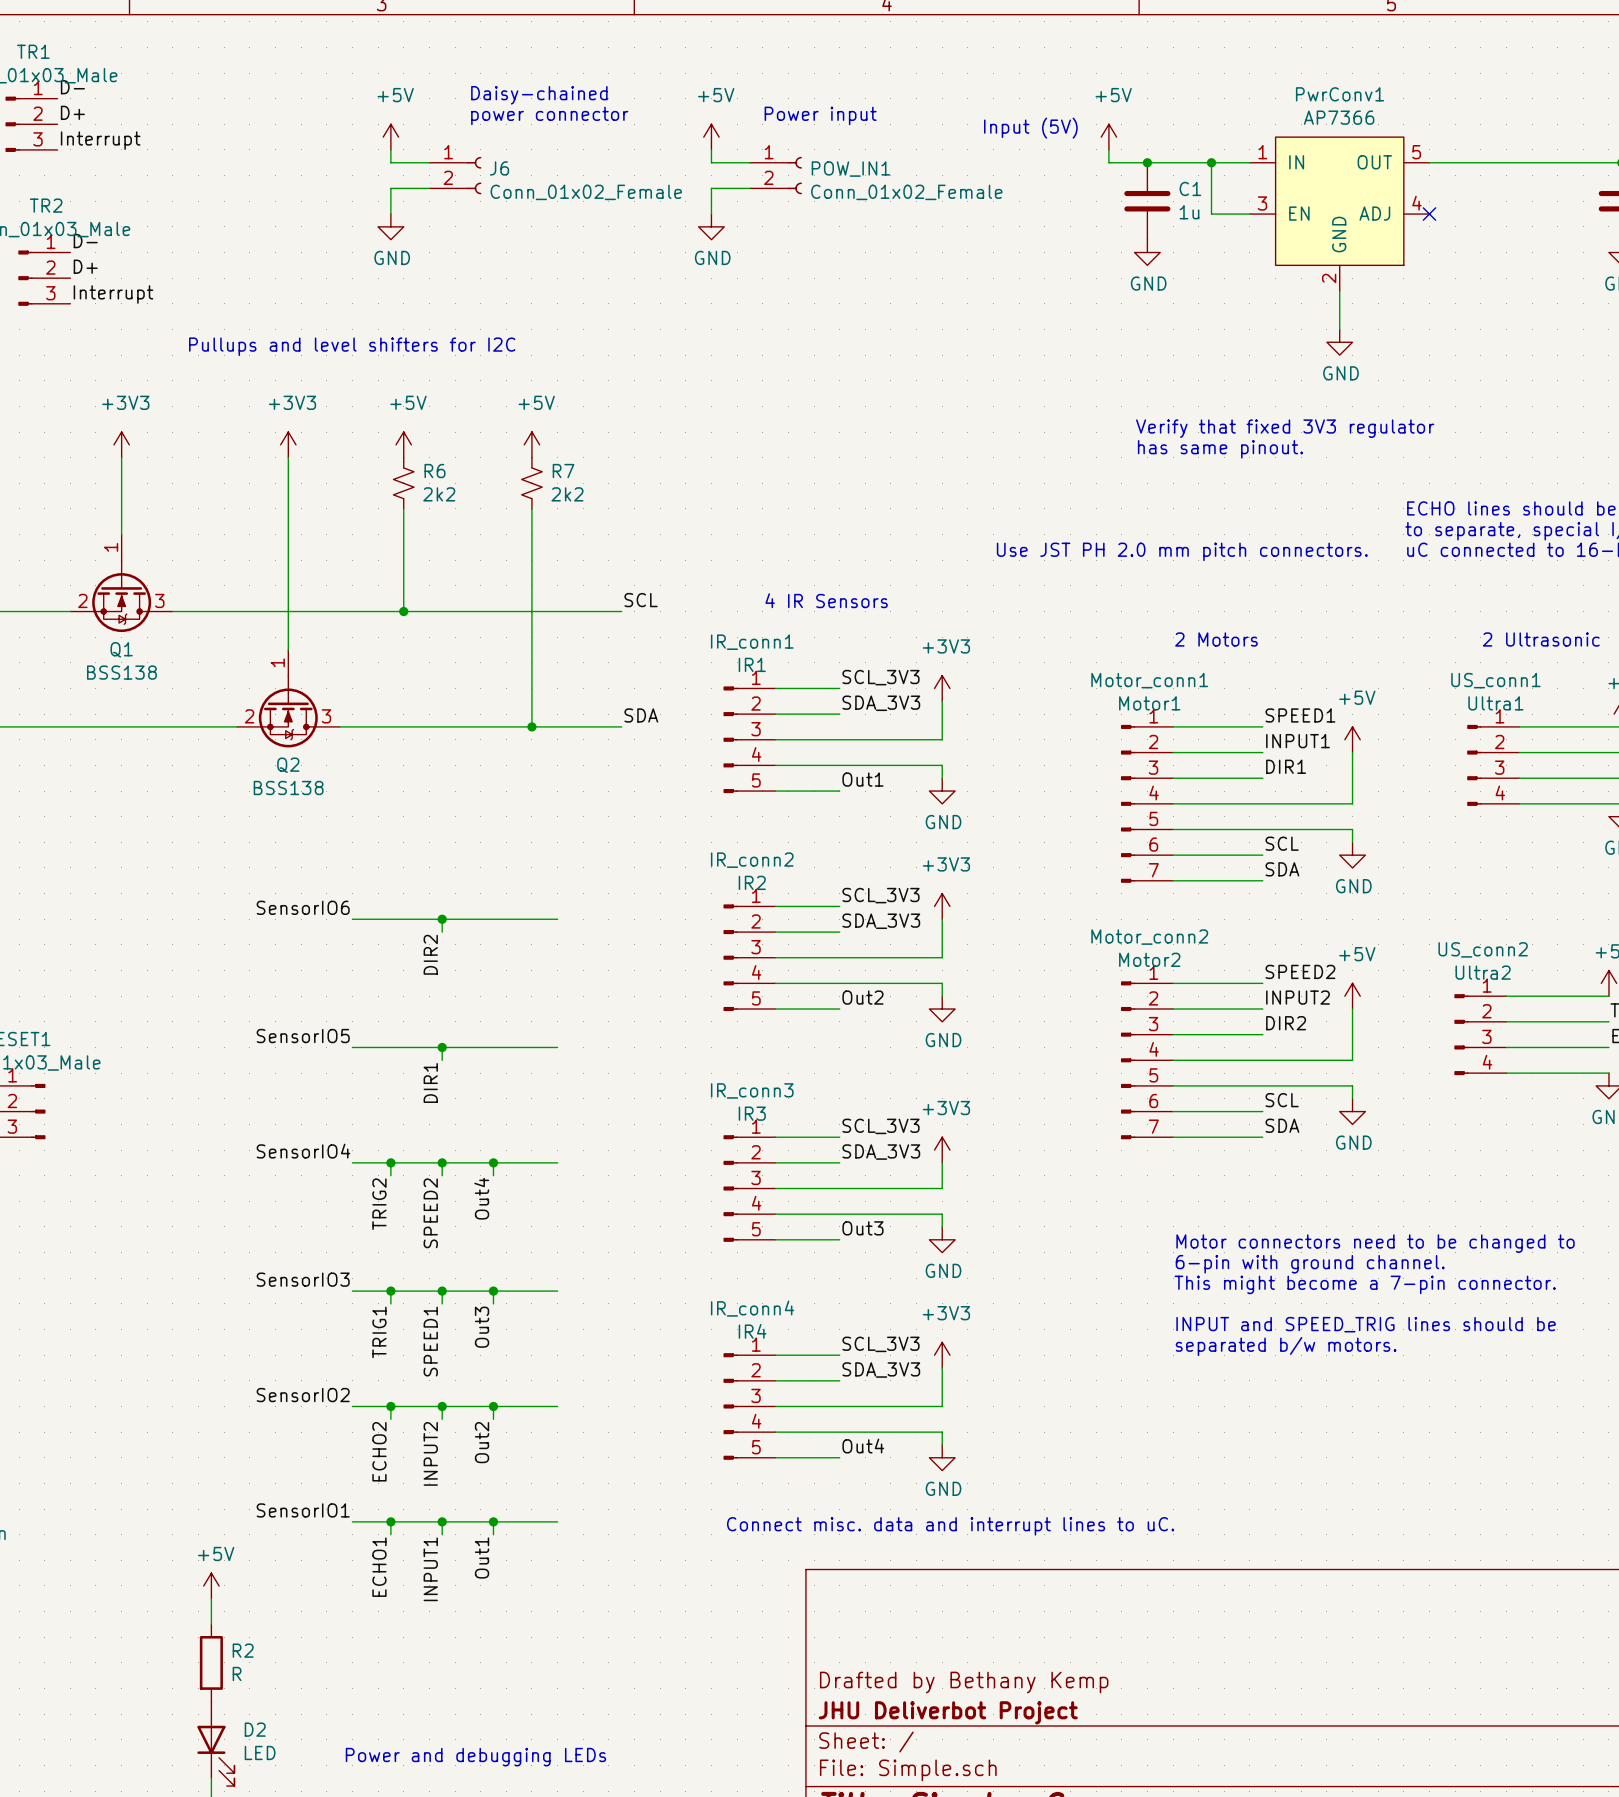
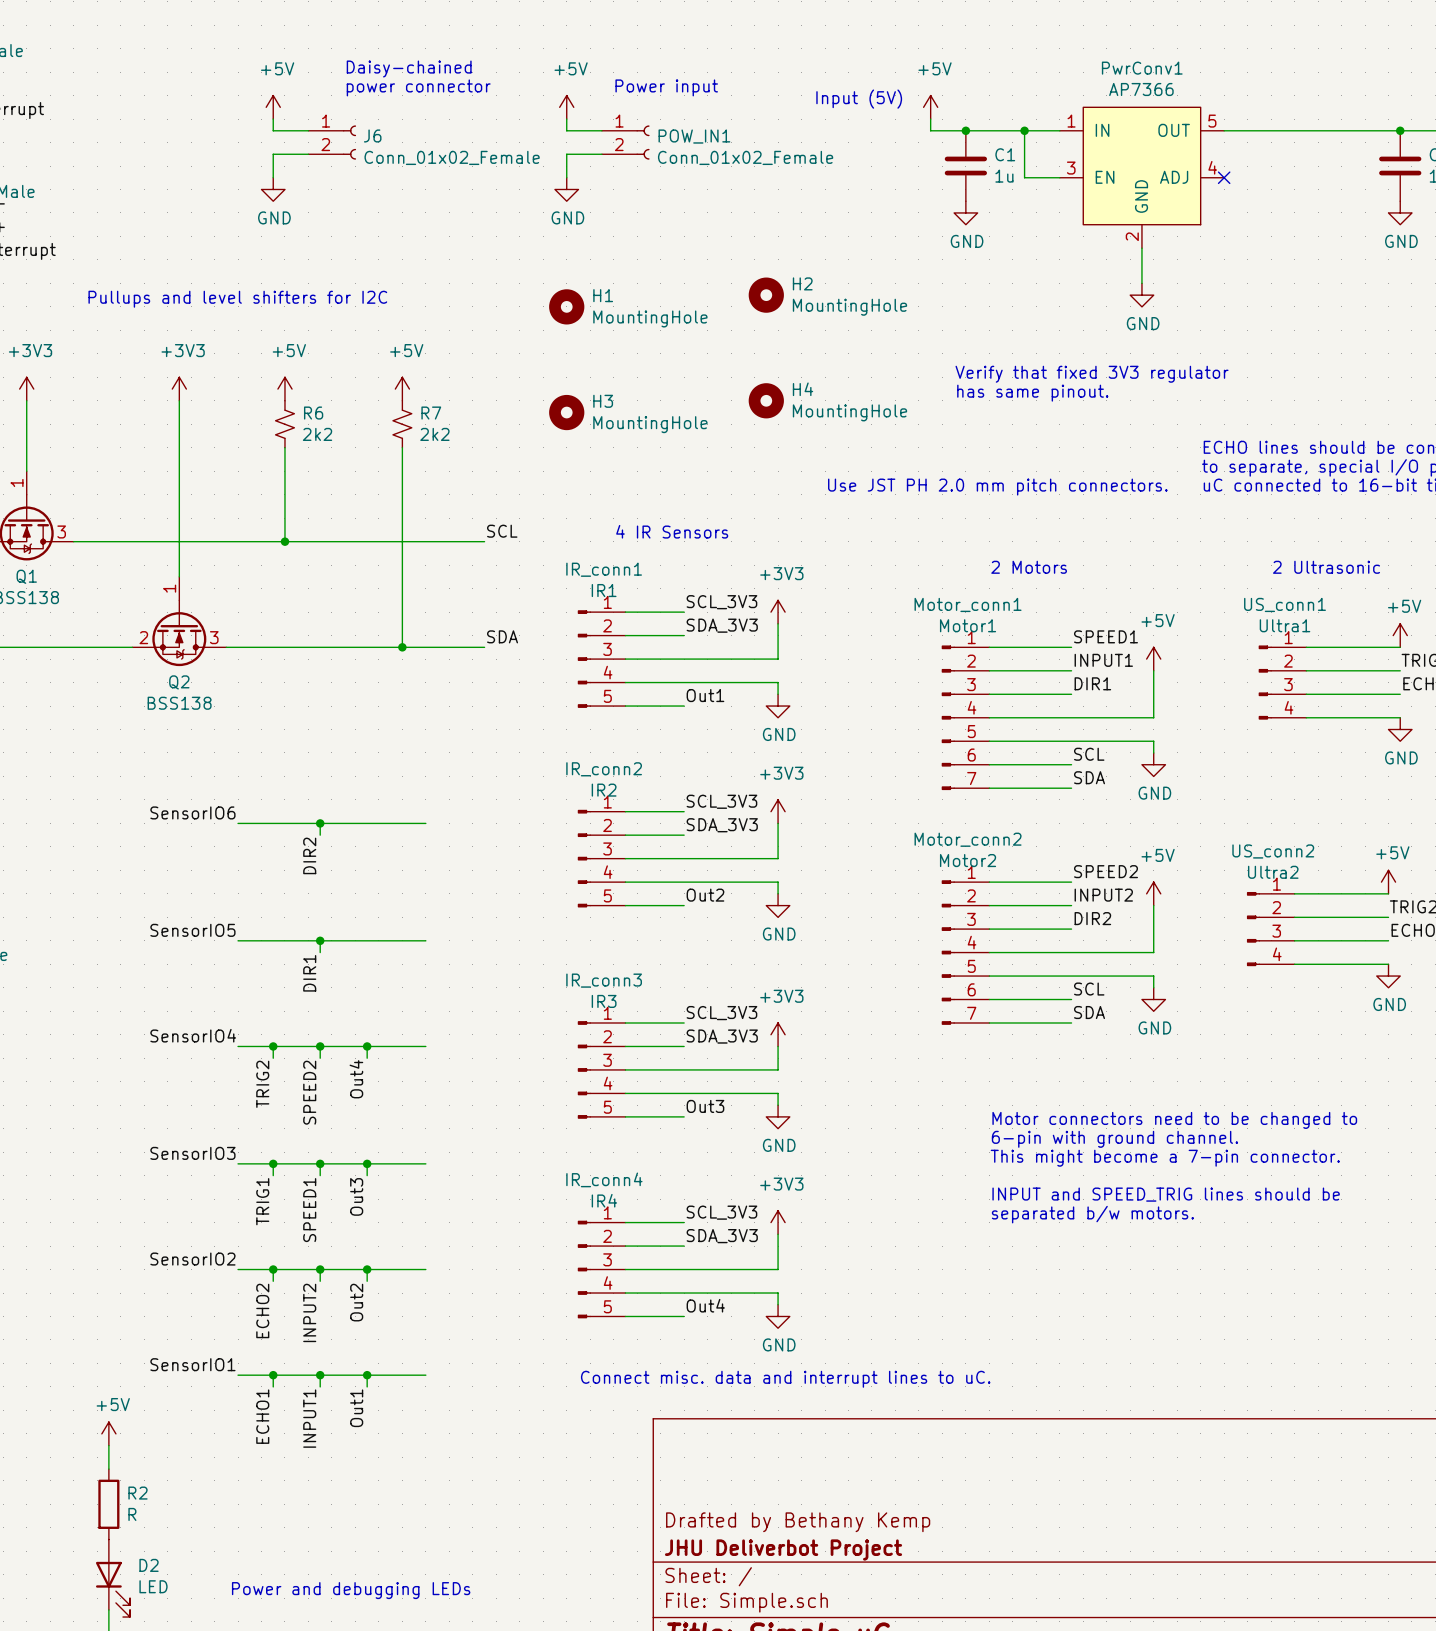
H2: none -> MountingHole (766, 295)
H1: none -> MountingHole (566, 306)
H4: none -> MountingHole (766, 400)
H3: none -> MountingHole (566, 412)

